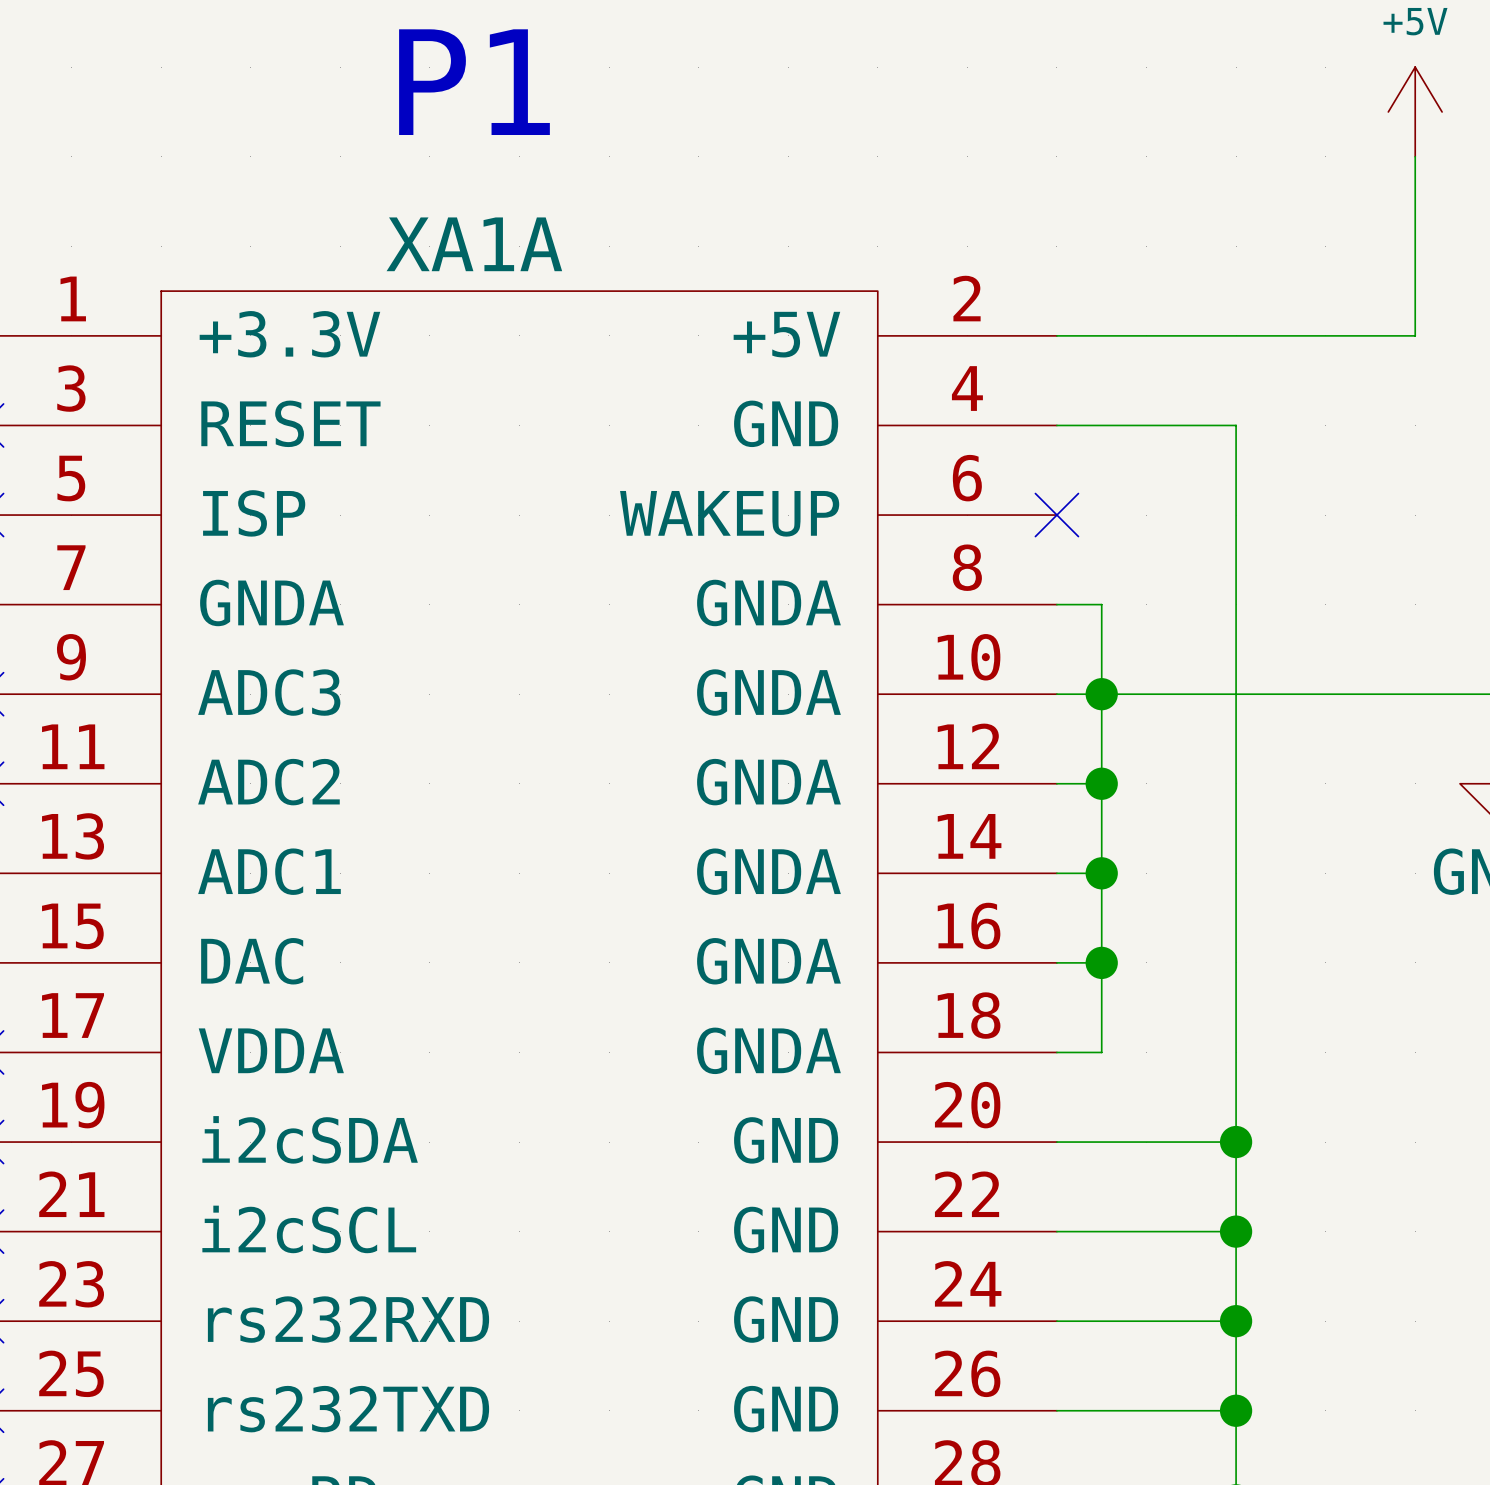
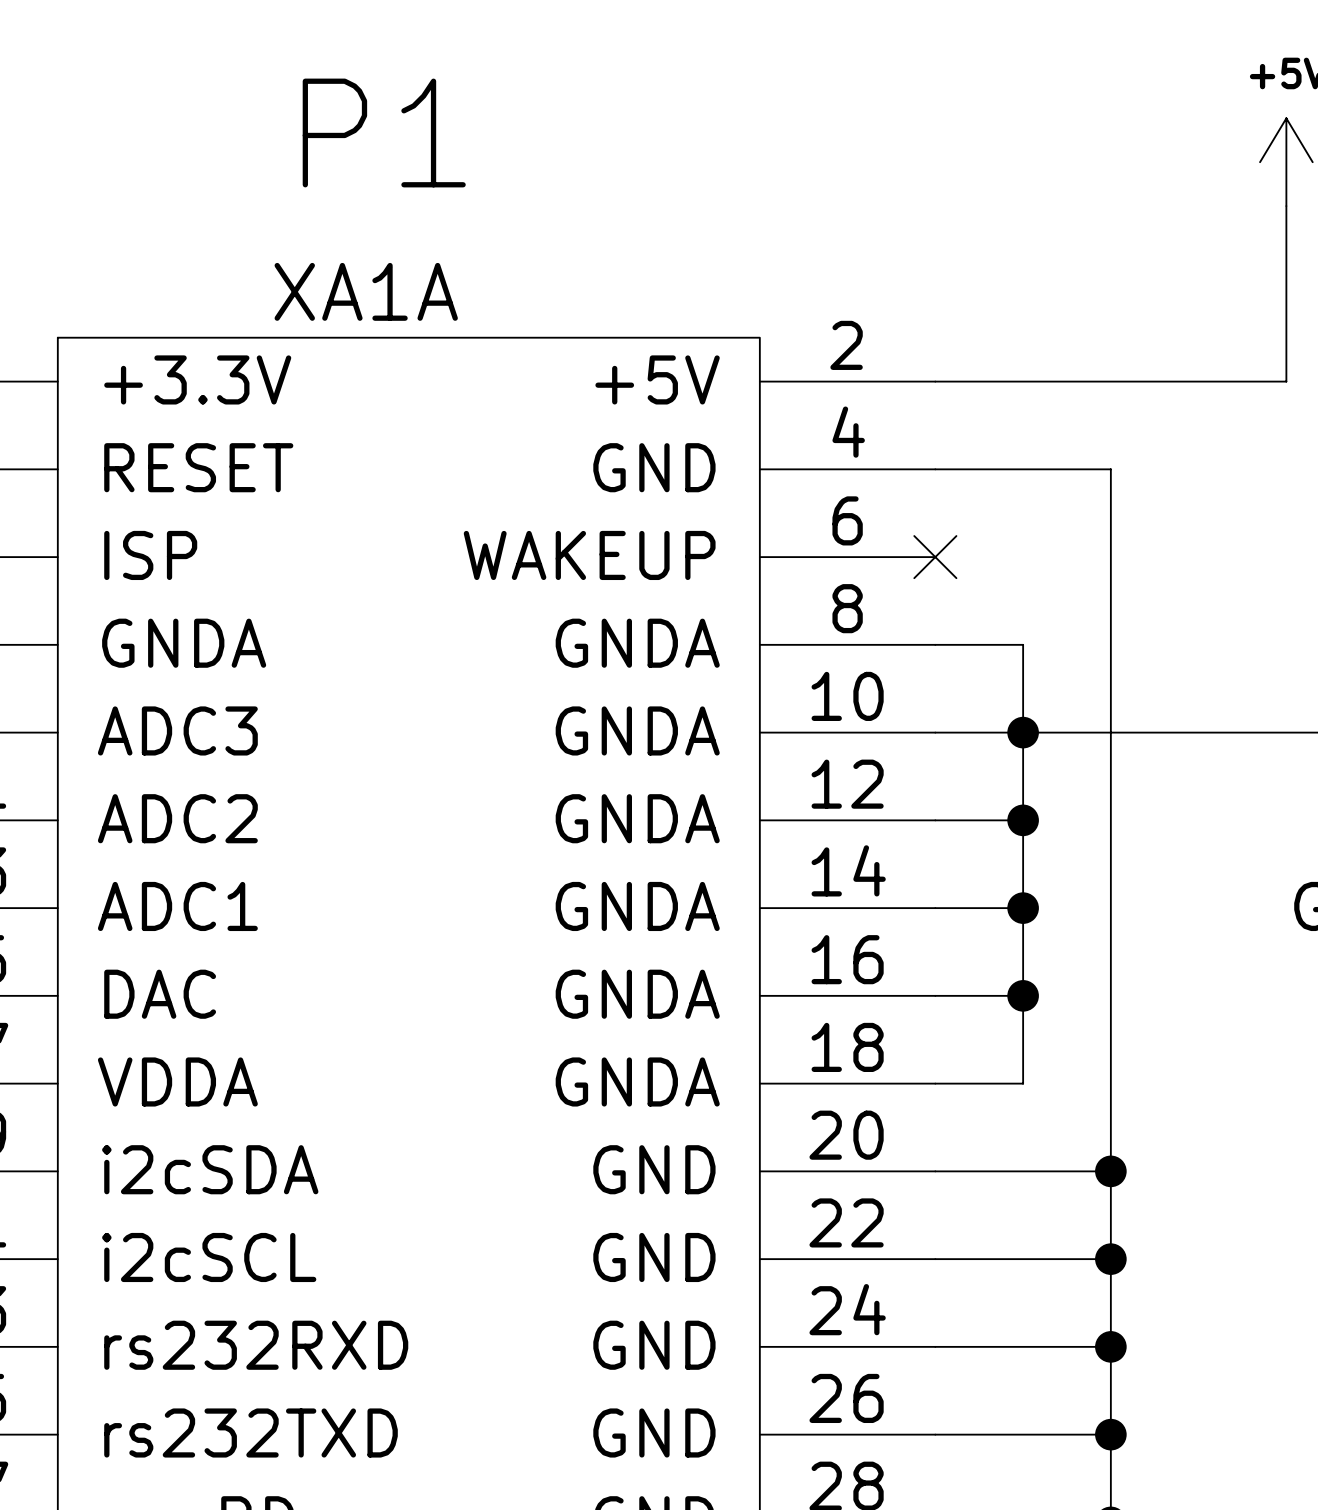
wire: (1101, 604) (1101, 1052) -> (979, 644) (1023, 644) (1023, 1083) (979, 1083)
junction position: (1101, 694) -> (1023, 732)
wire: none -> (979, 820) (1023, 820)
junction position: (1101, 783) -> (1023, 820)
wire: none -> (979, 908) (1023, 908)
junction position: (1101, 873) -> (1023, 908)
wire: none -> (979, 995) (1023, 995)
junction position: (1101, 962) -> (1023, 995)

